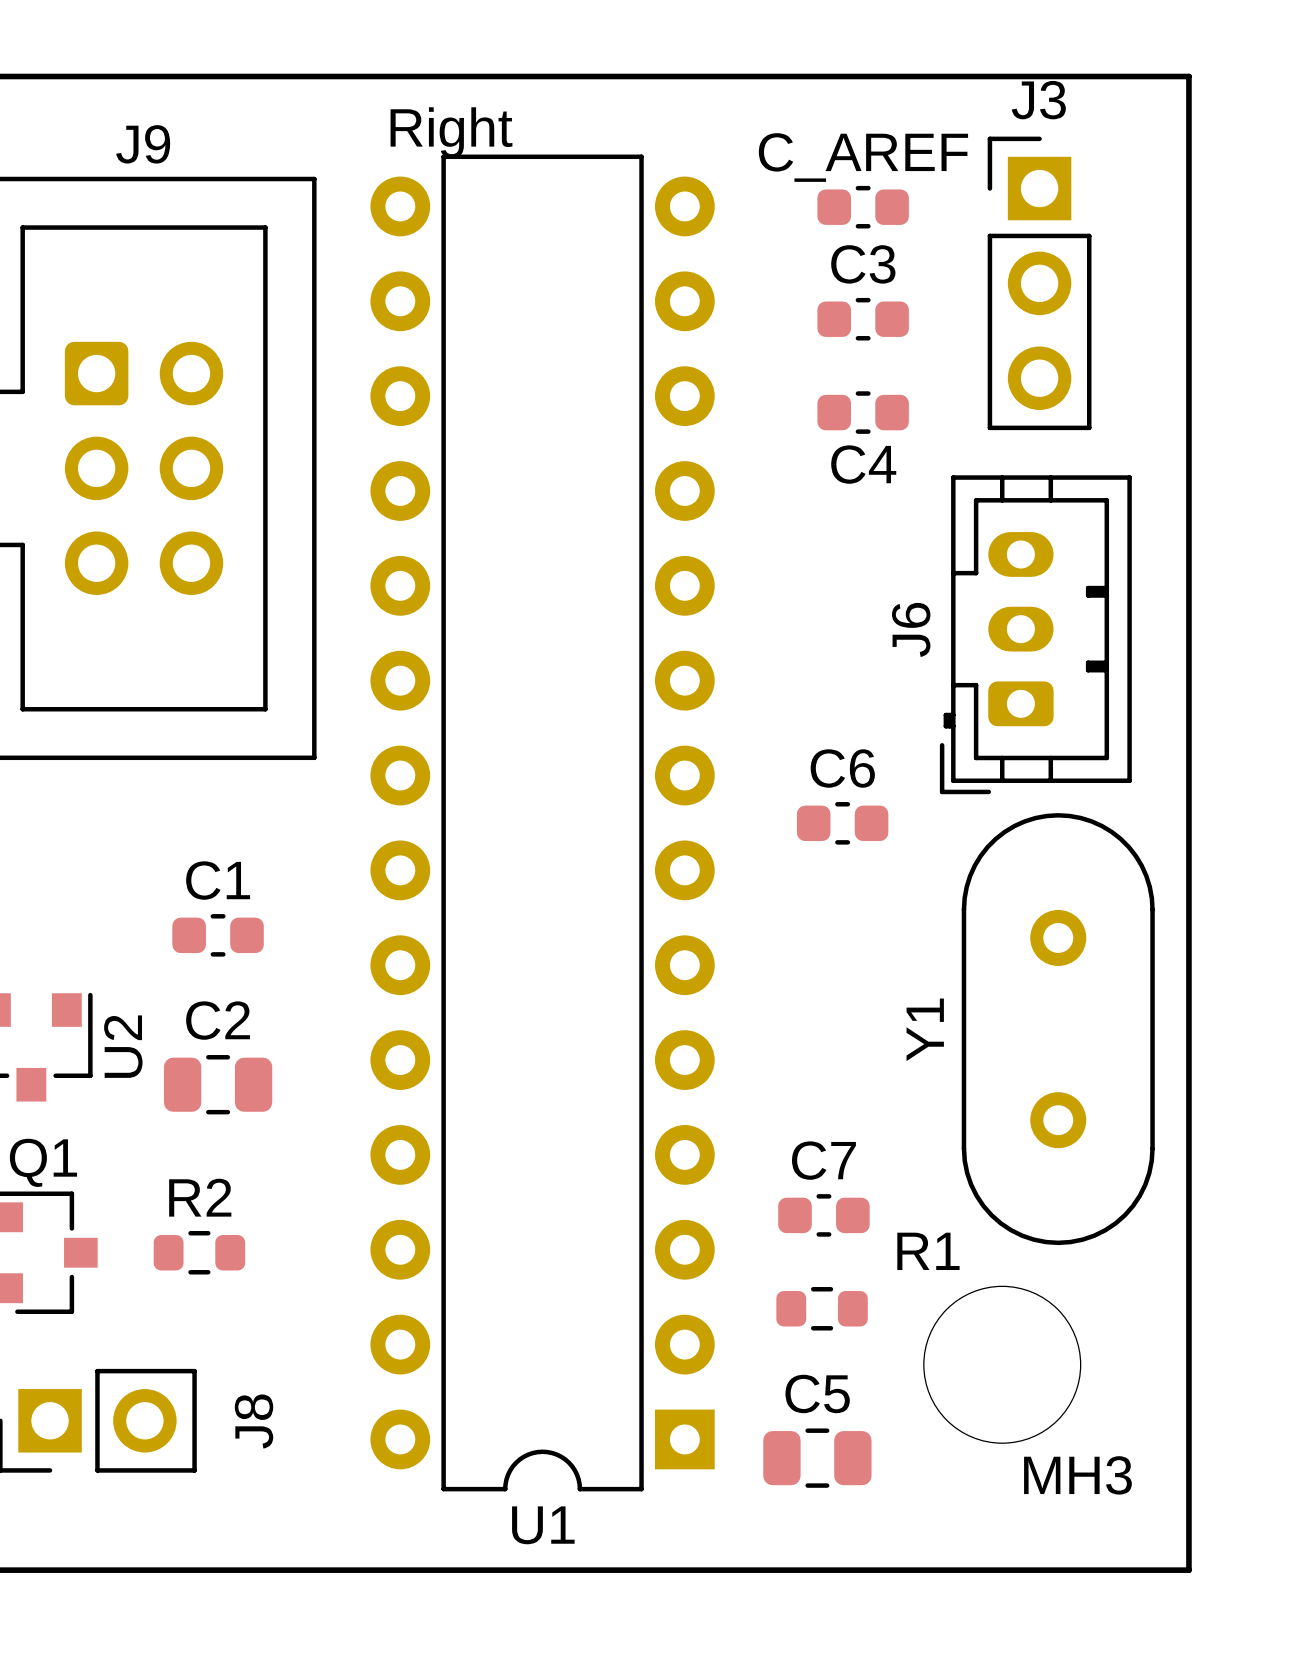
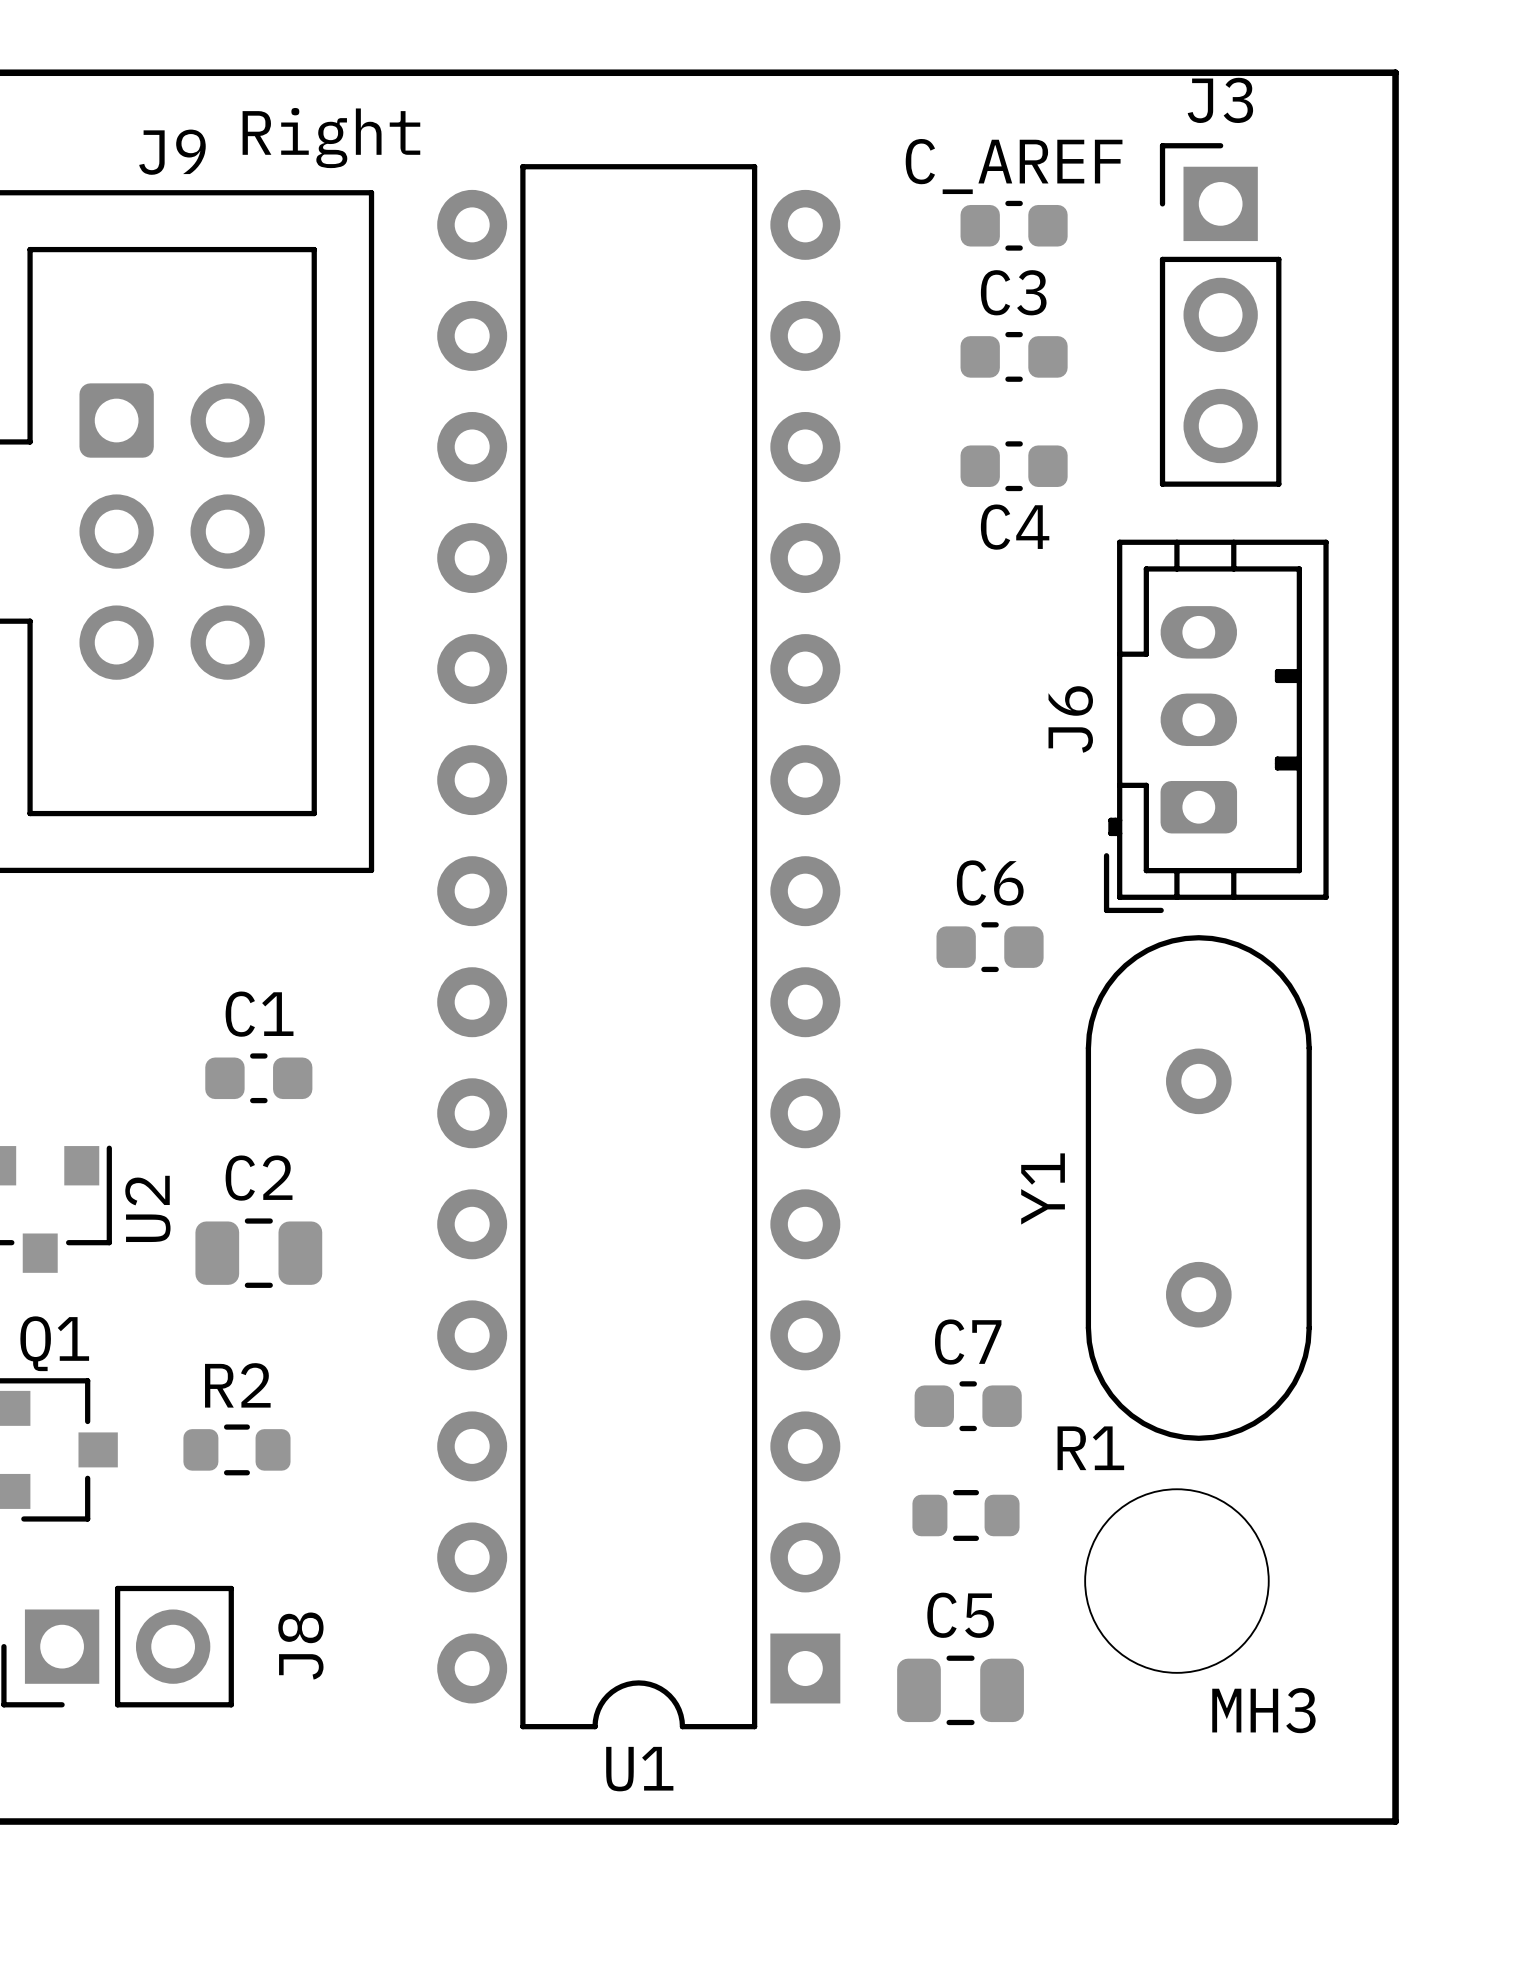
text position: Right (451, 132) -> Right (331, 138)
Y1 position: (1058, 1029) -> (1198, 1188)

